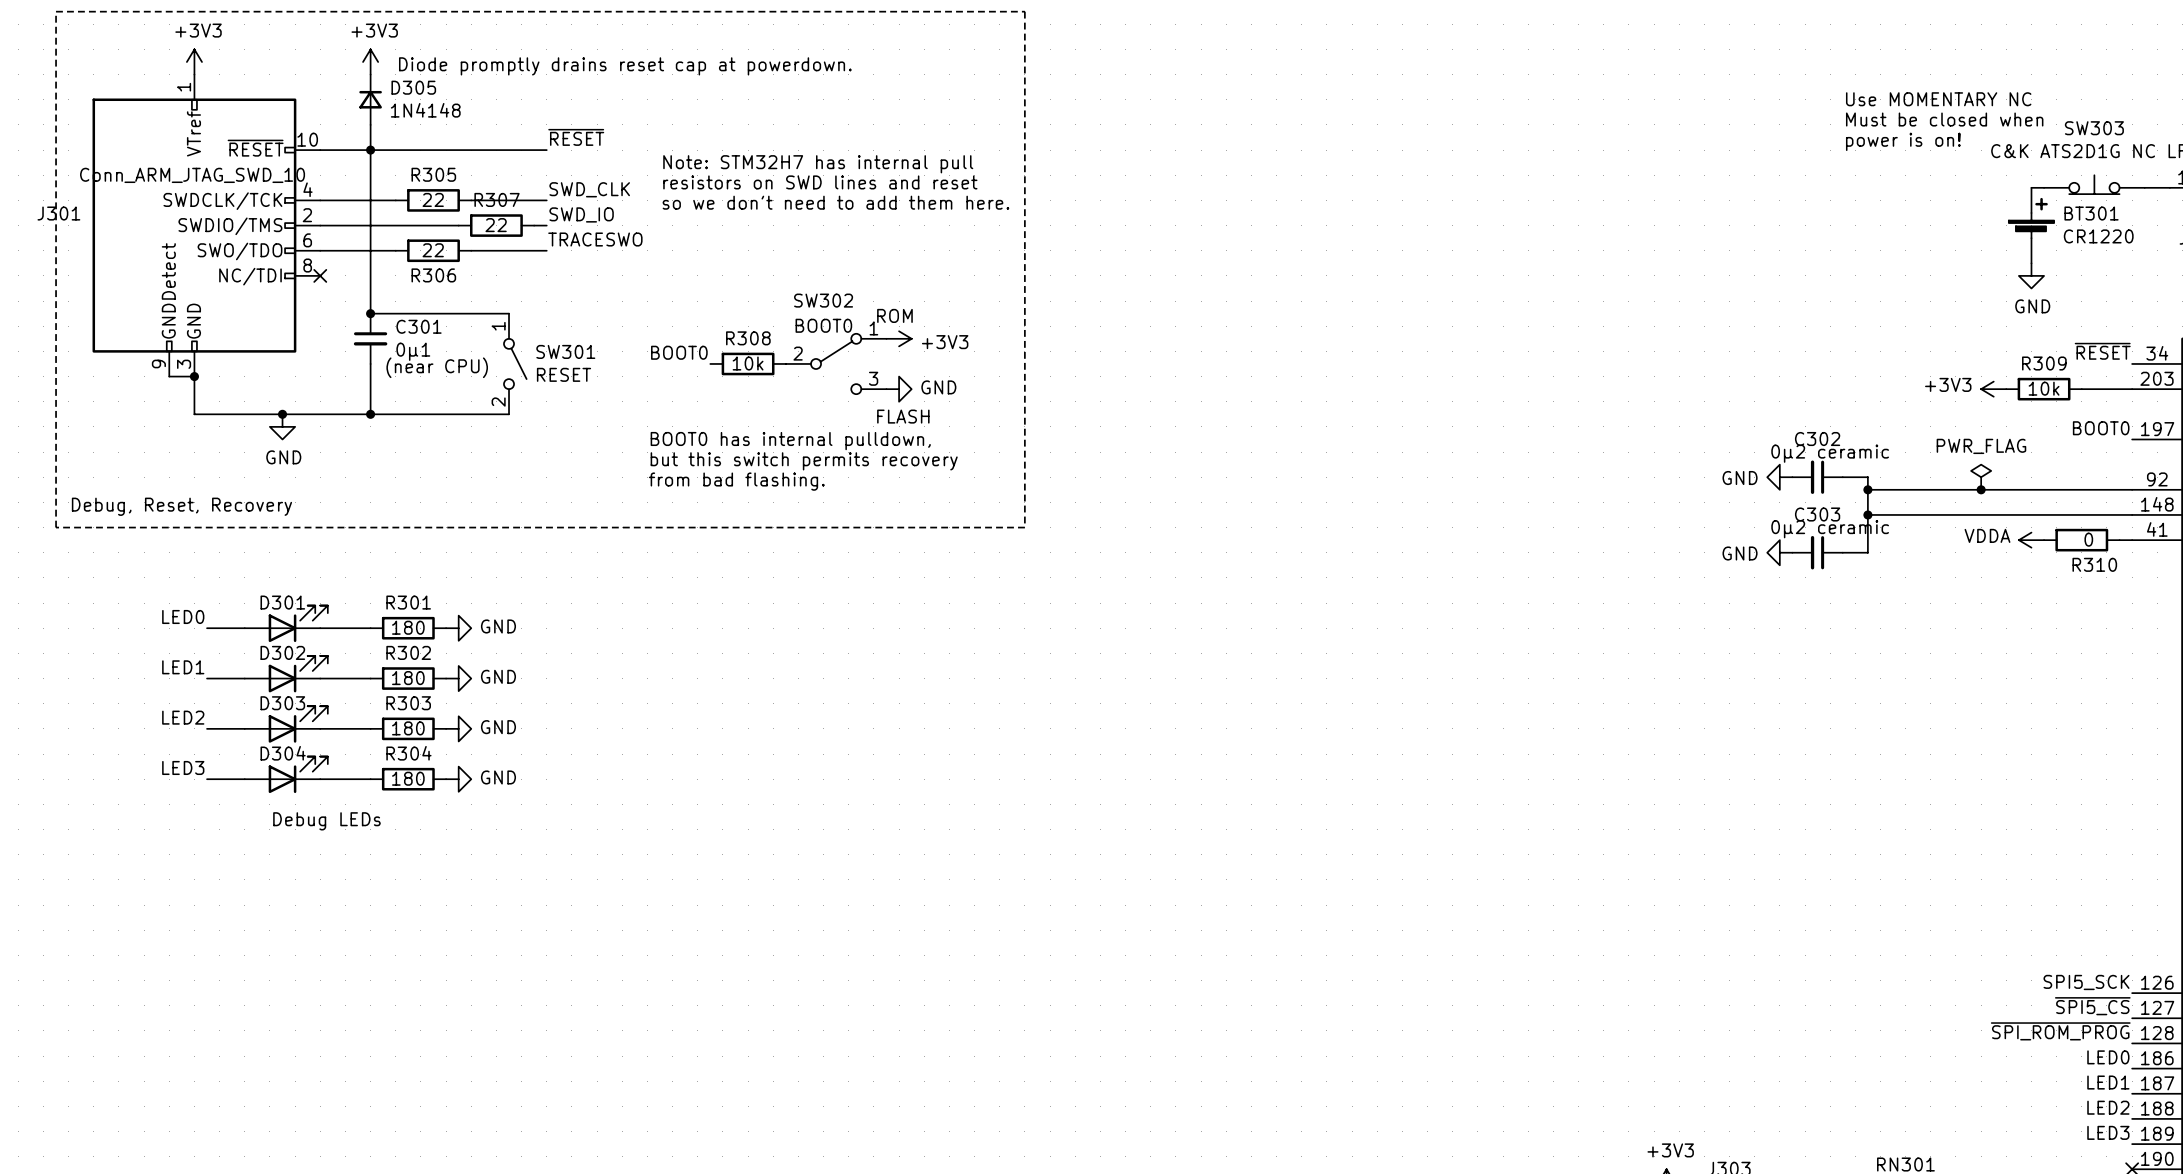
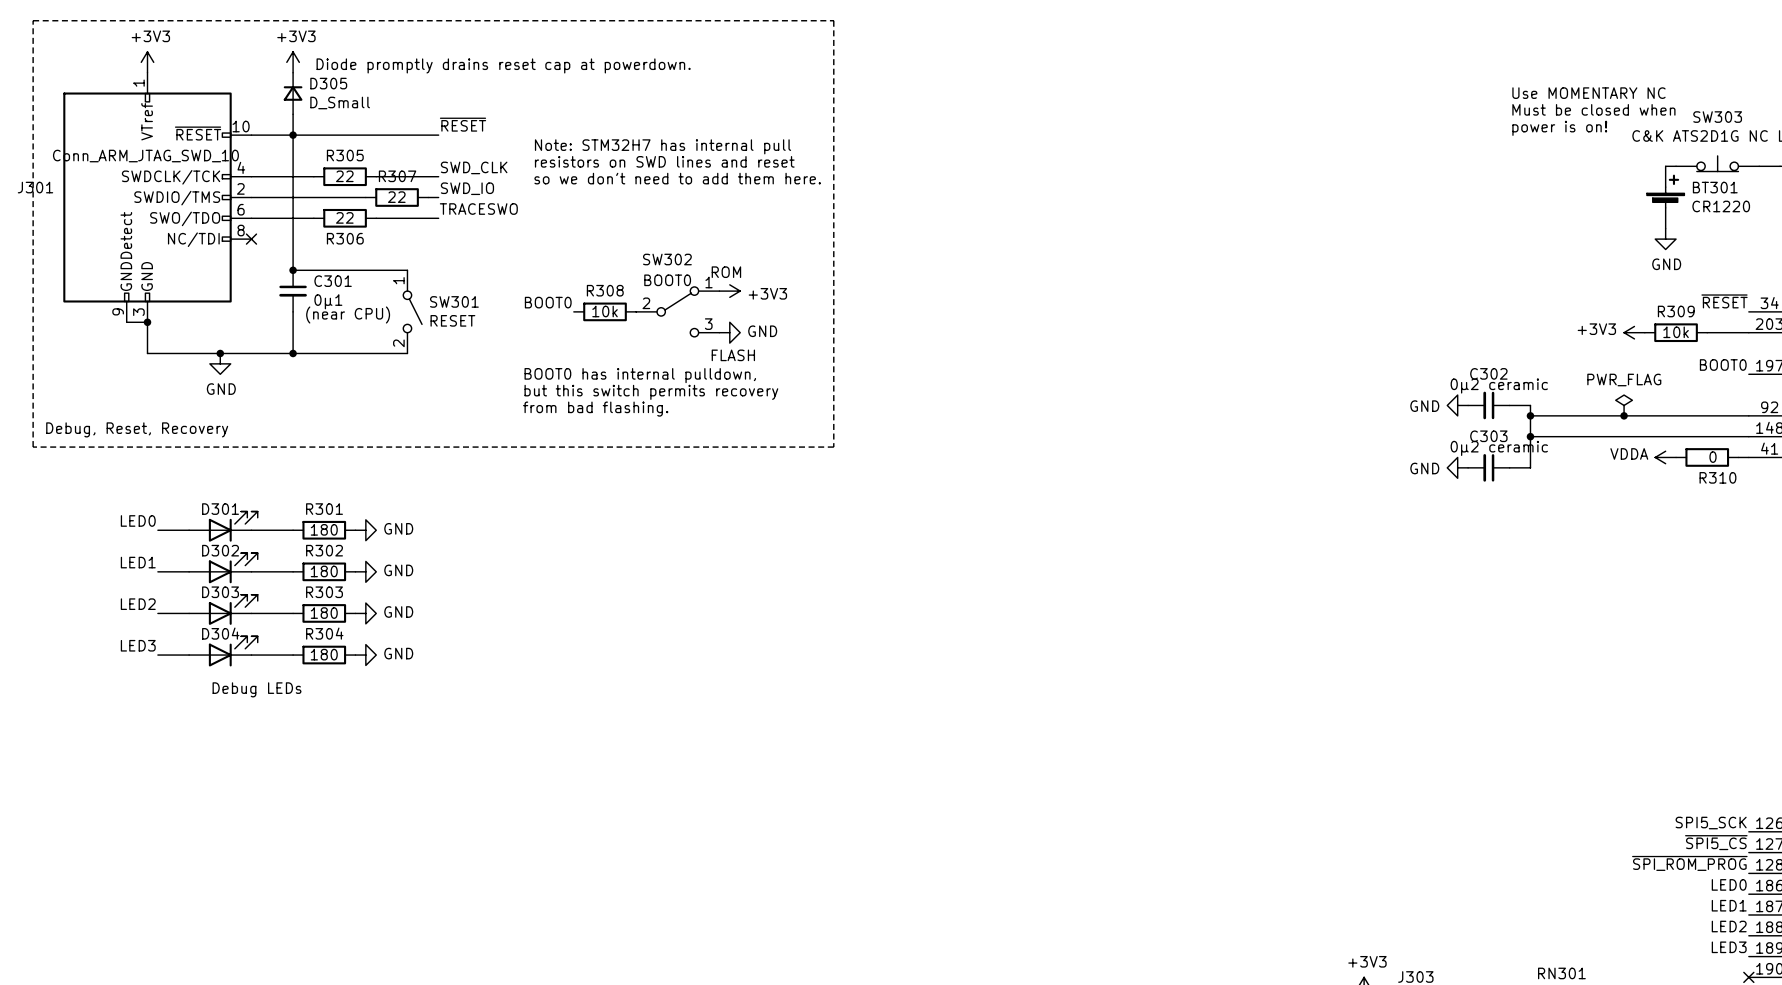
D305 value: 1N4148 (425, 110) -> D_Small (340, 102)

